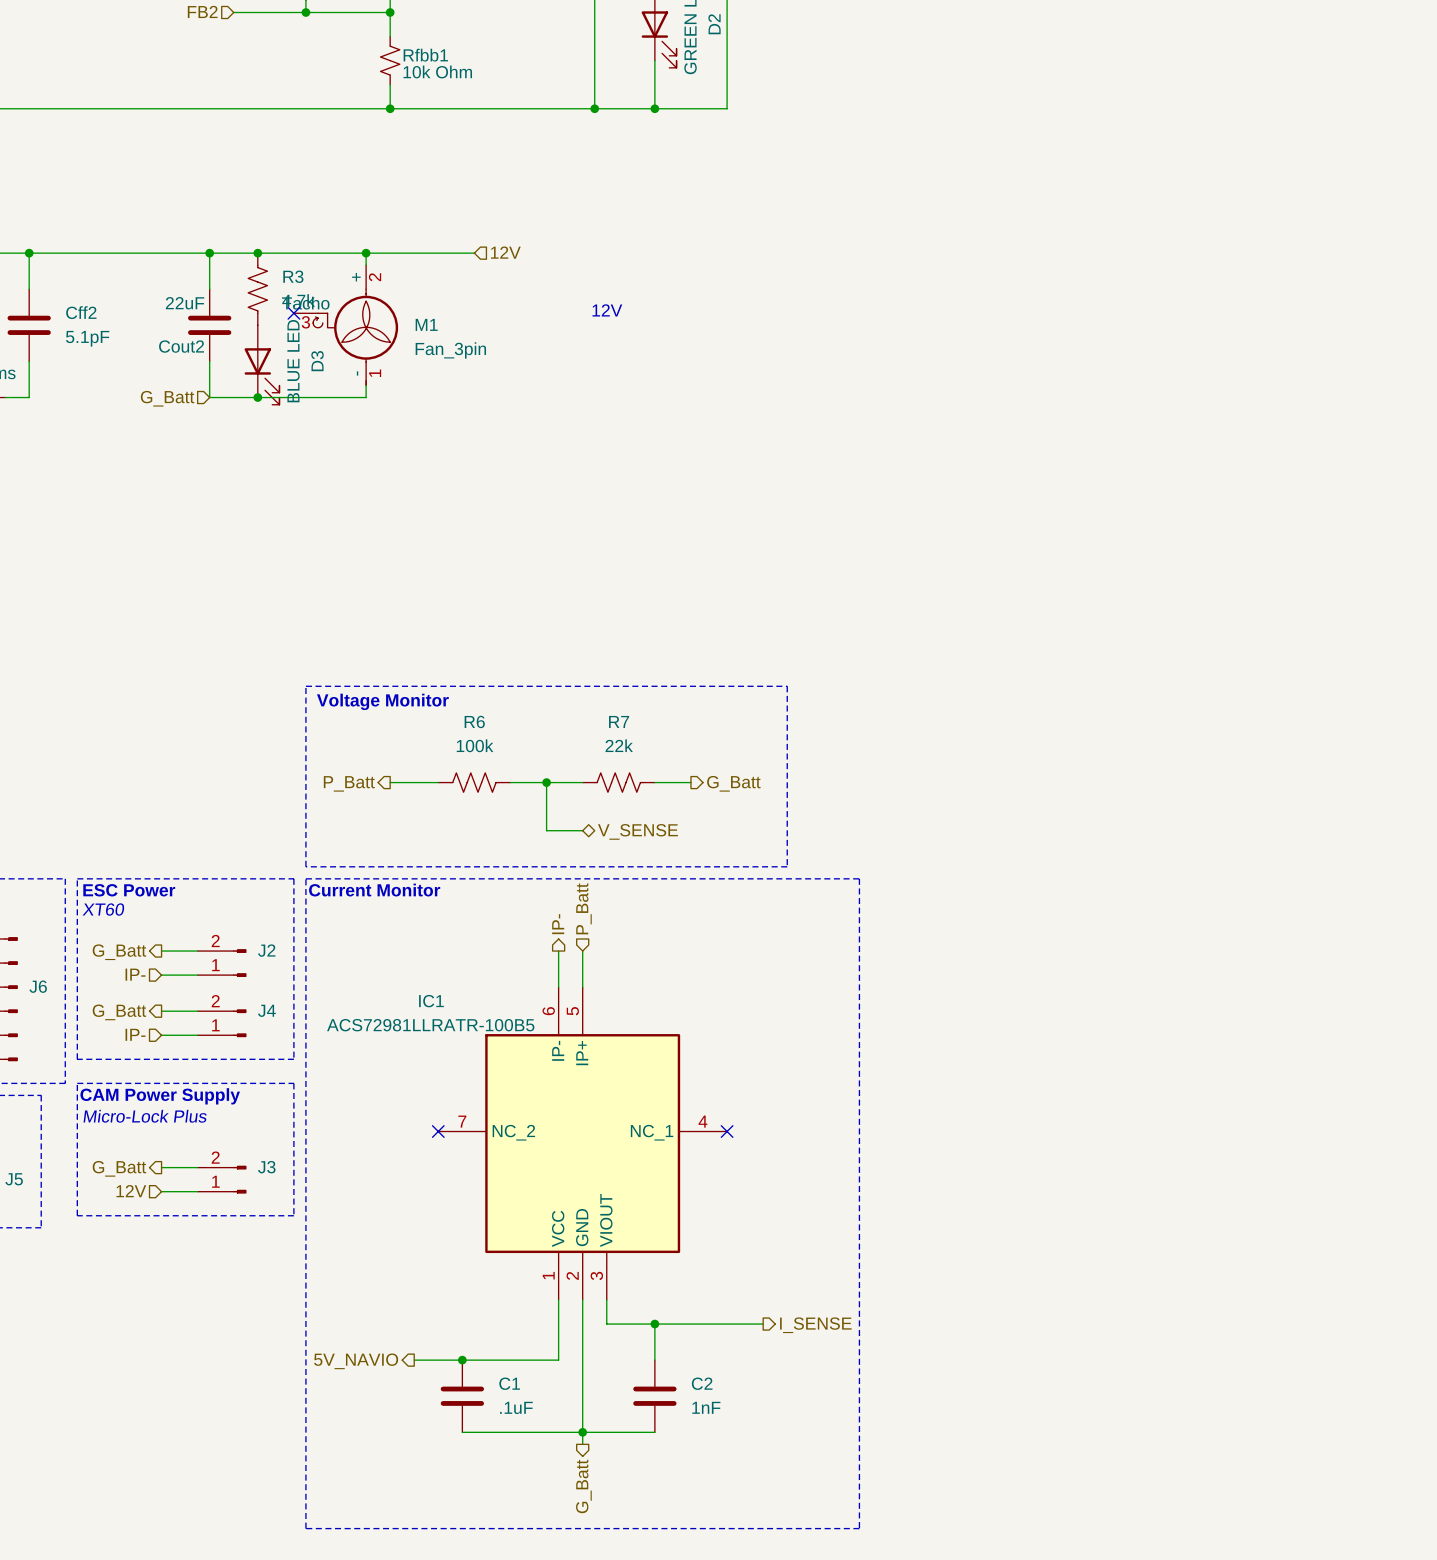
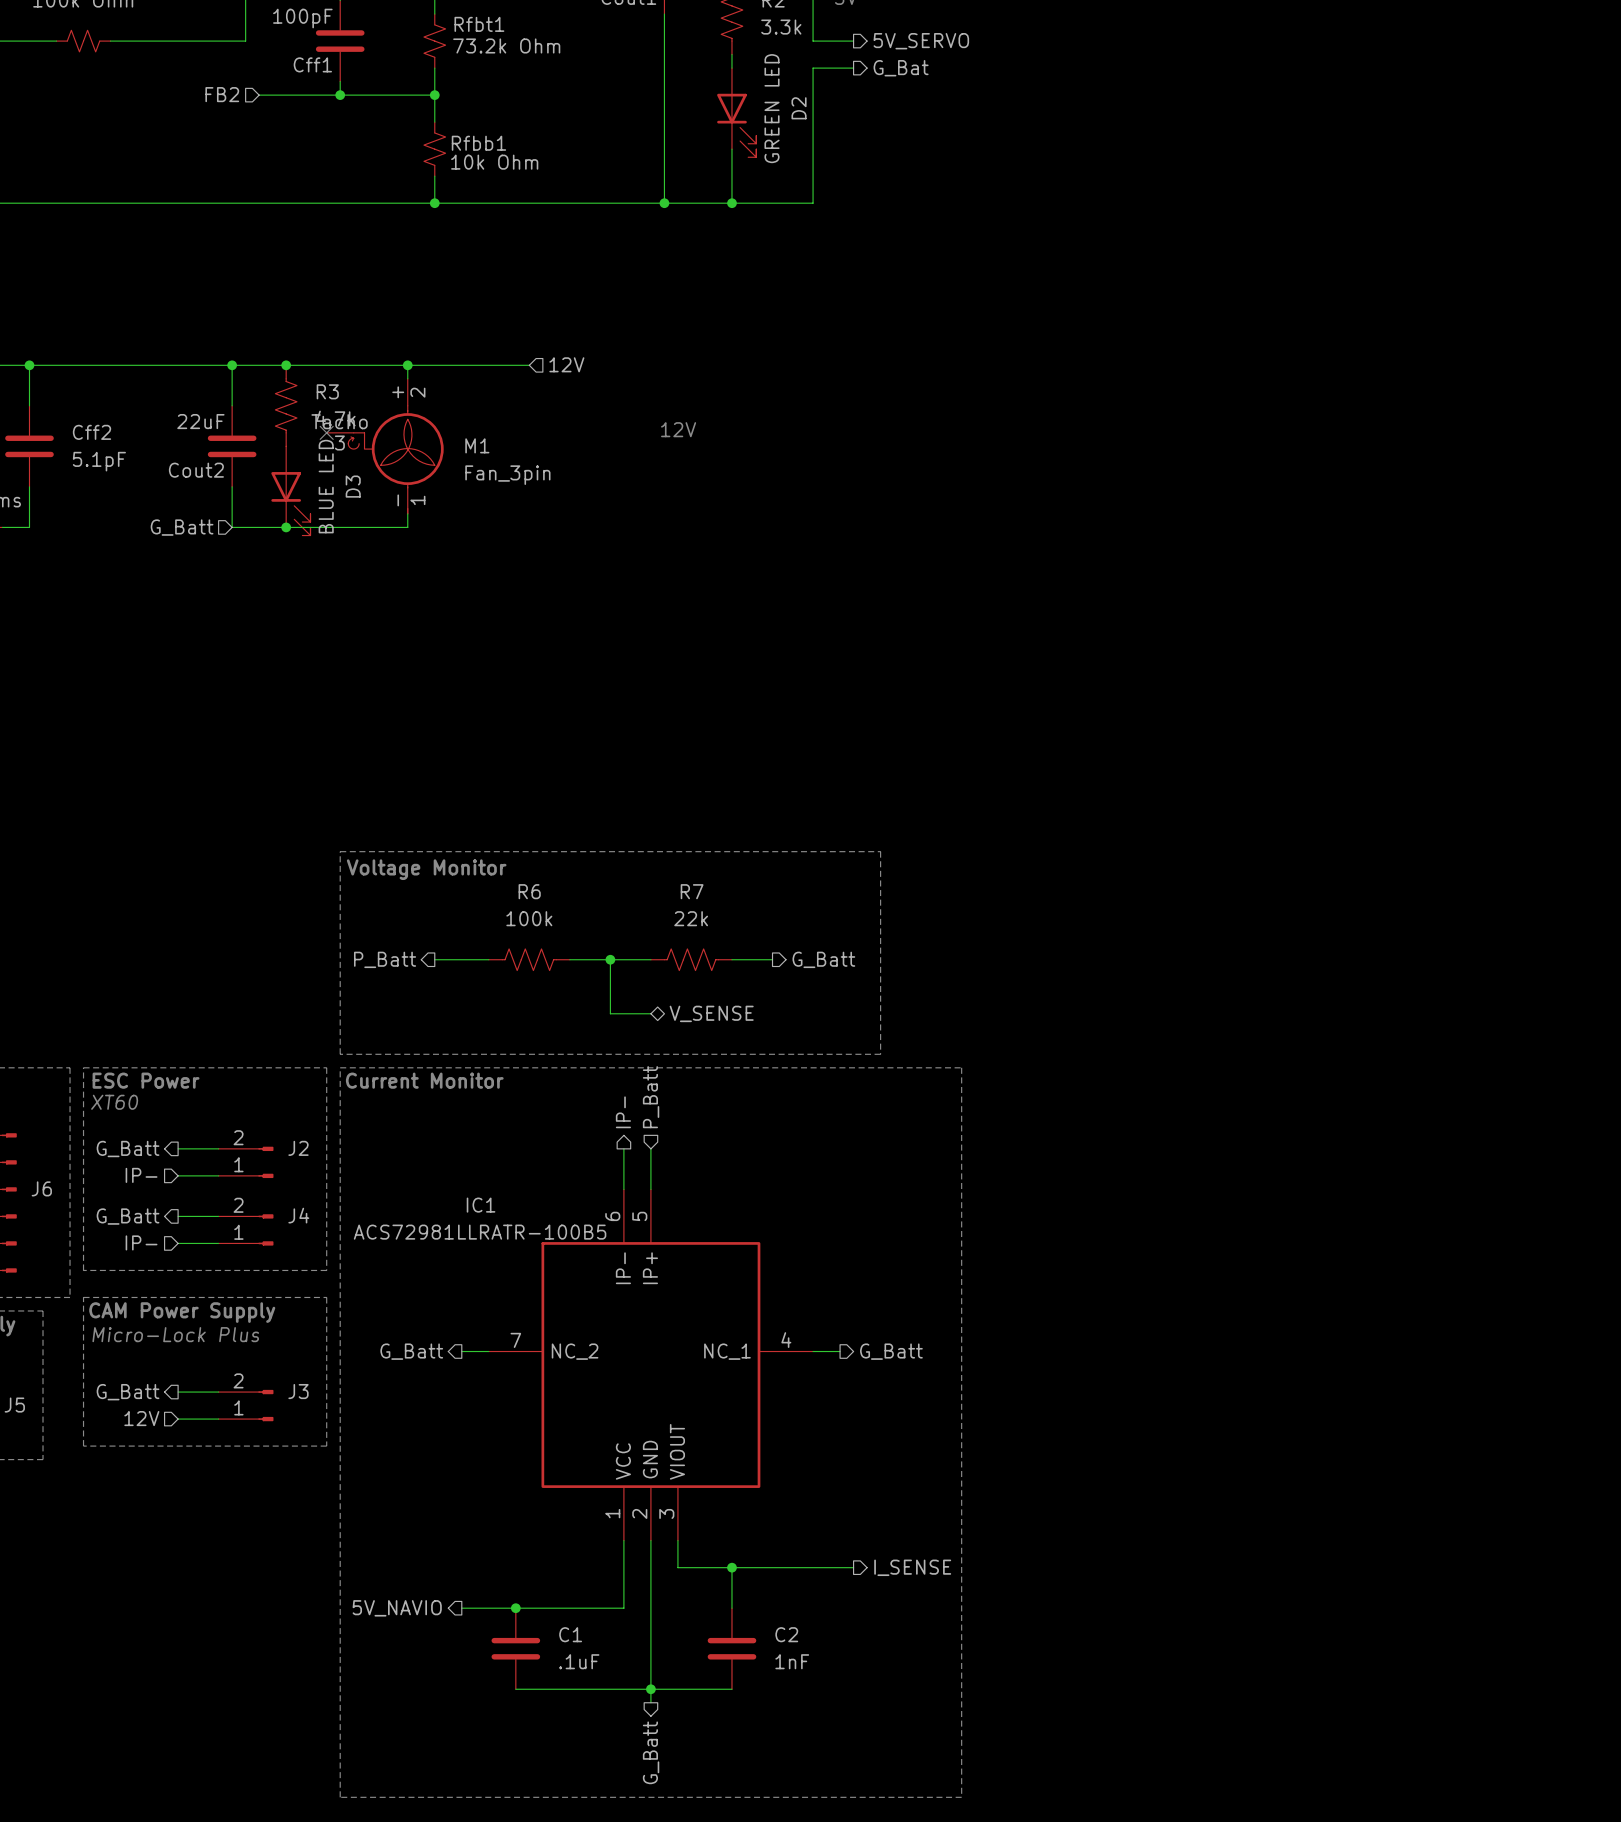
wire: none -> (461, 1351) (488, 1351)
no-connect mark: (438, 1131) -> none
wire: none -> (813, 1351) (840, 1351)
no-connect mark: (727, 1131) -> none
hierarchical label: none -> G_Batt (411, 1351)
hierarchical label: none -> G_Batt (891, 1351)

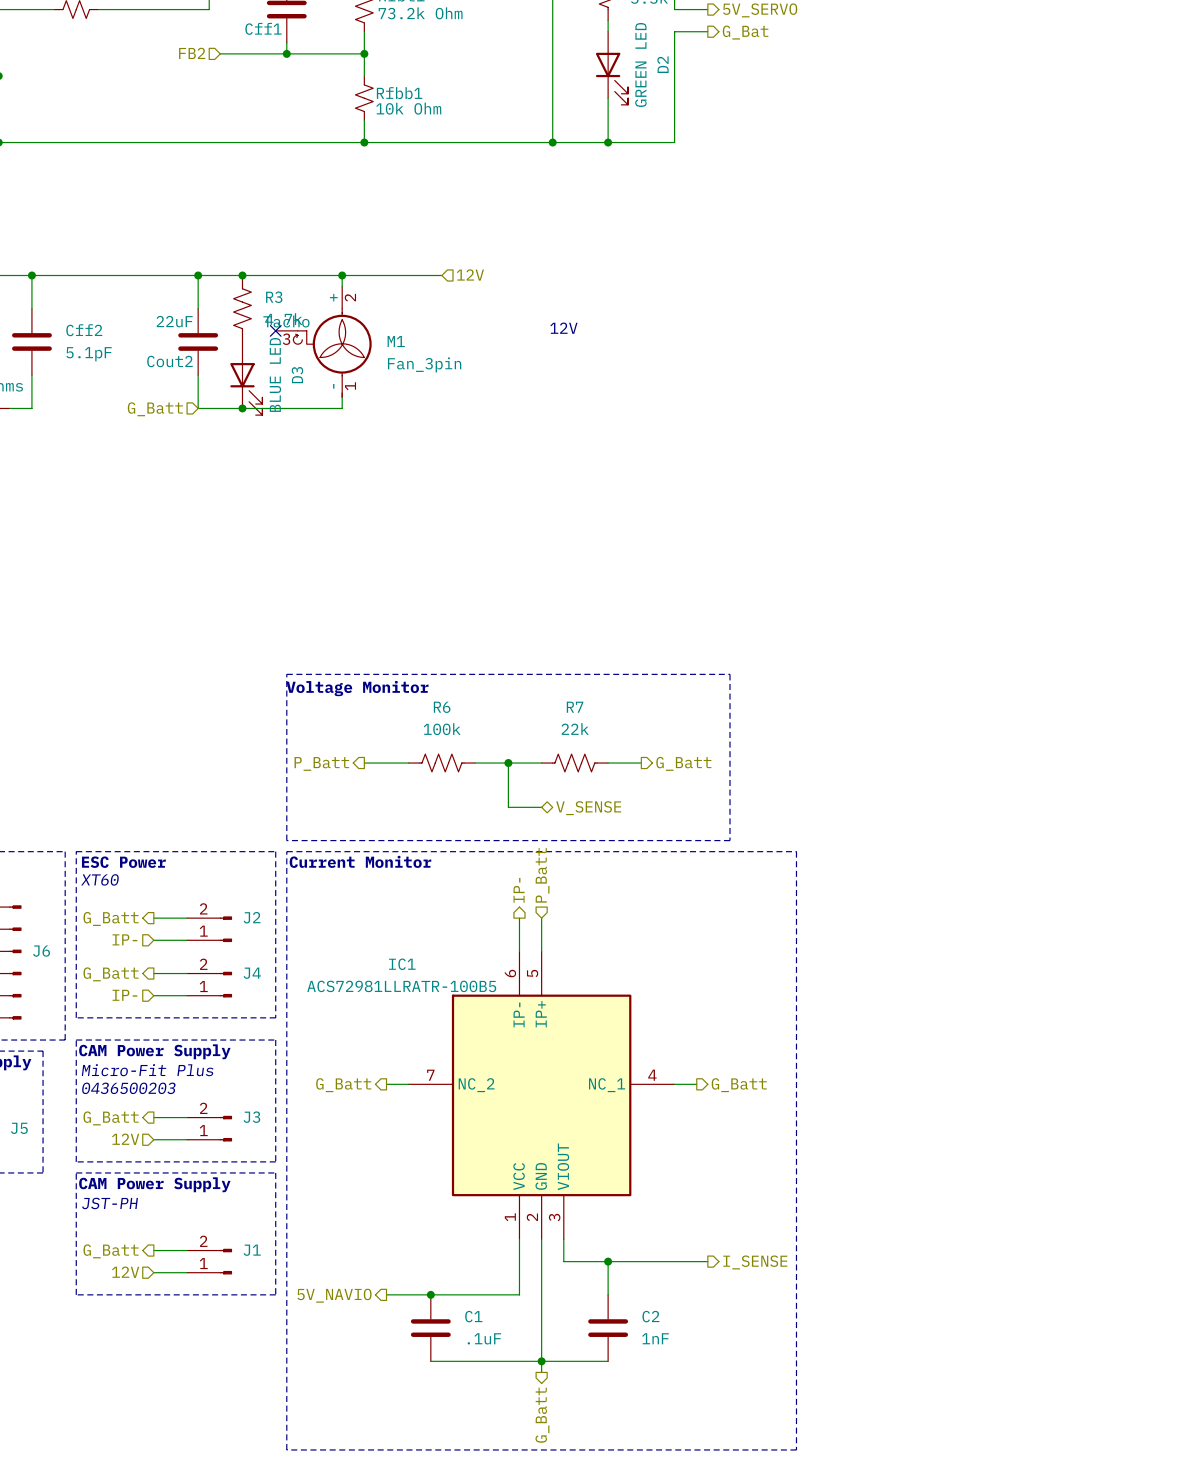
text: Micro-Lock Plus (175, 1334) -> Micro-Fit Plus (147, 1070)
text: none -> 0436500203 (128, 1088)
line: none -> (76, 1172) (275, 1172) (275, 1294) (76, 1294) (76, 1172)
text: none -> CAM Power Supply (154, 1184)
text: none -> JST-PH (110, 1203)
hierarchical label: none -> G_Batt (111, 1251)
wire: none -> (153, 1250) (187, 1250)
J1: none -> (209, 1261)
hierarchical label: none -> 12V (125, 1272)
wire: none -> (153, 1272) (187, 1272)

